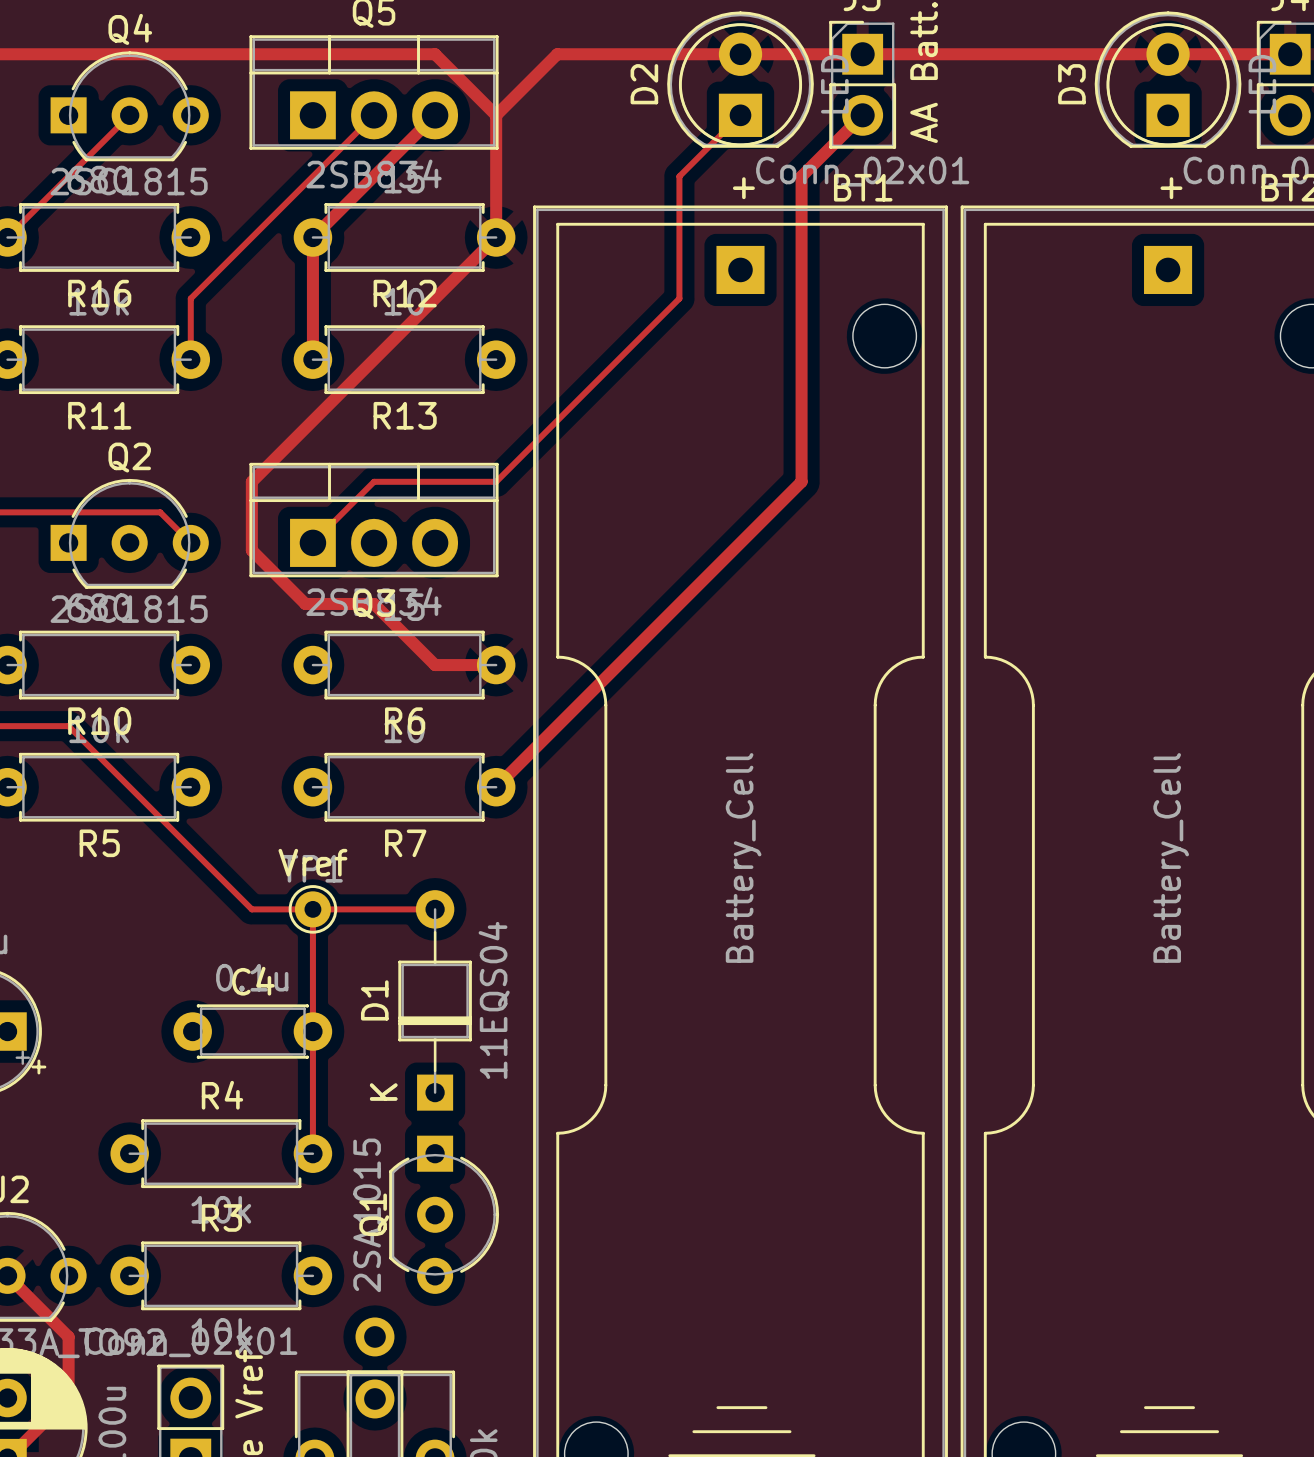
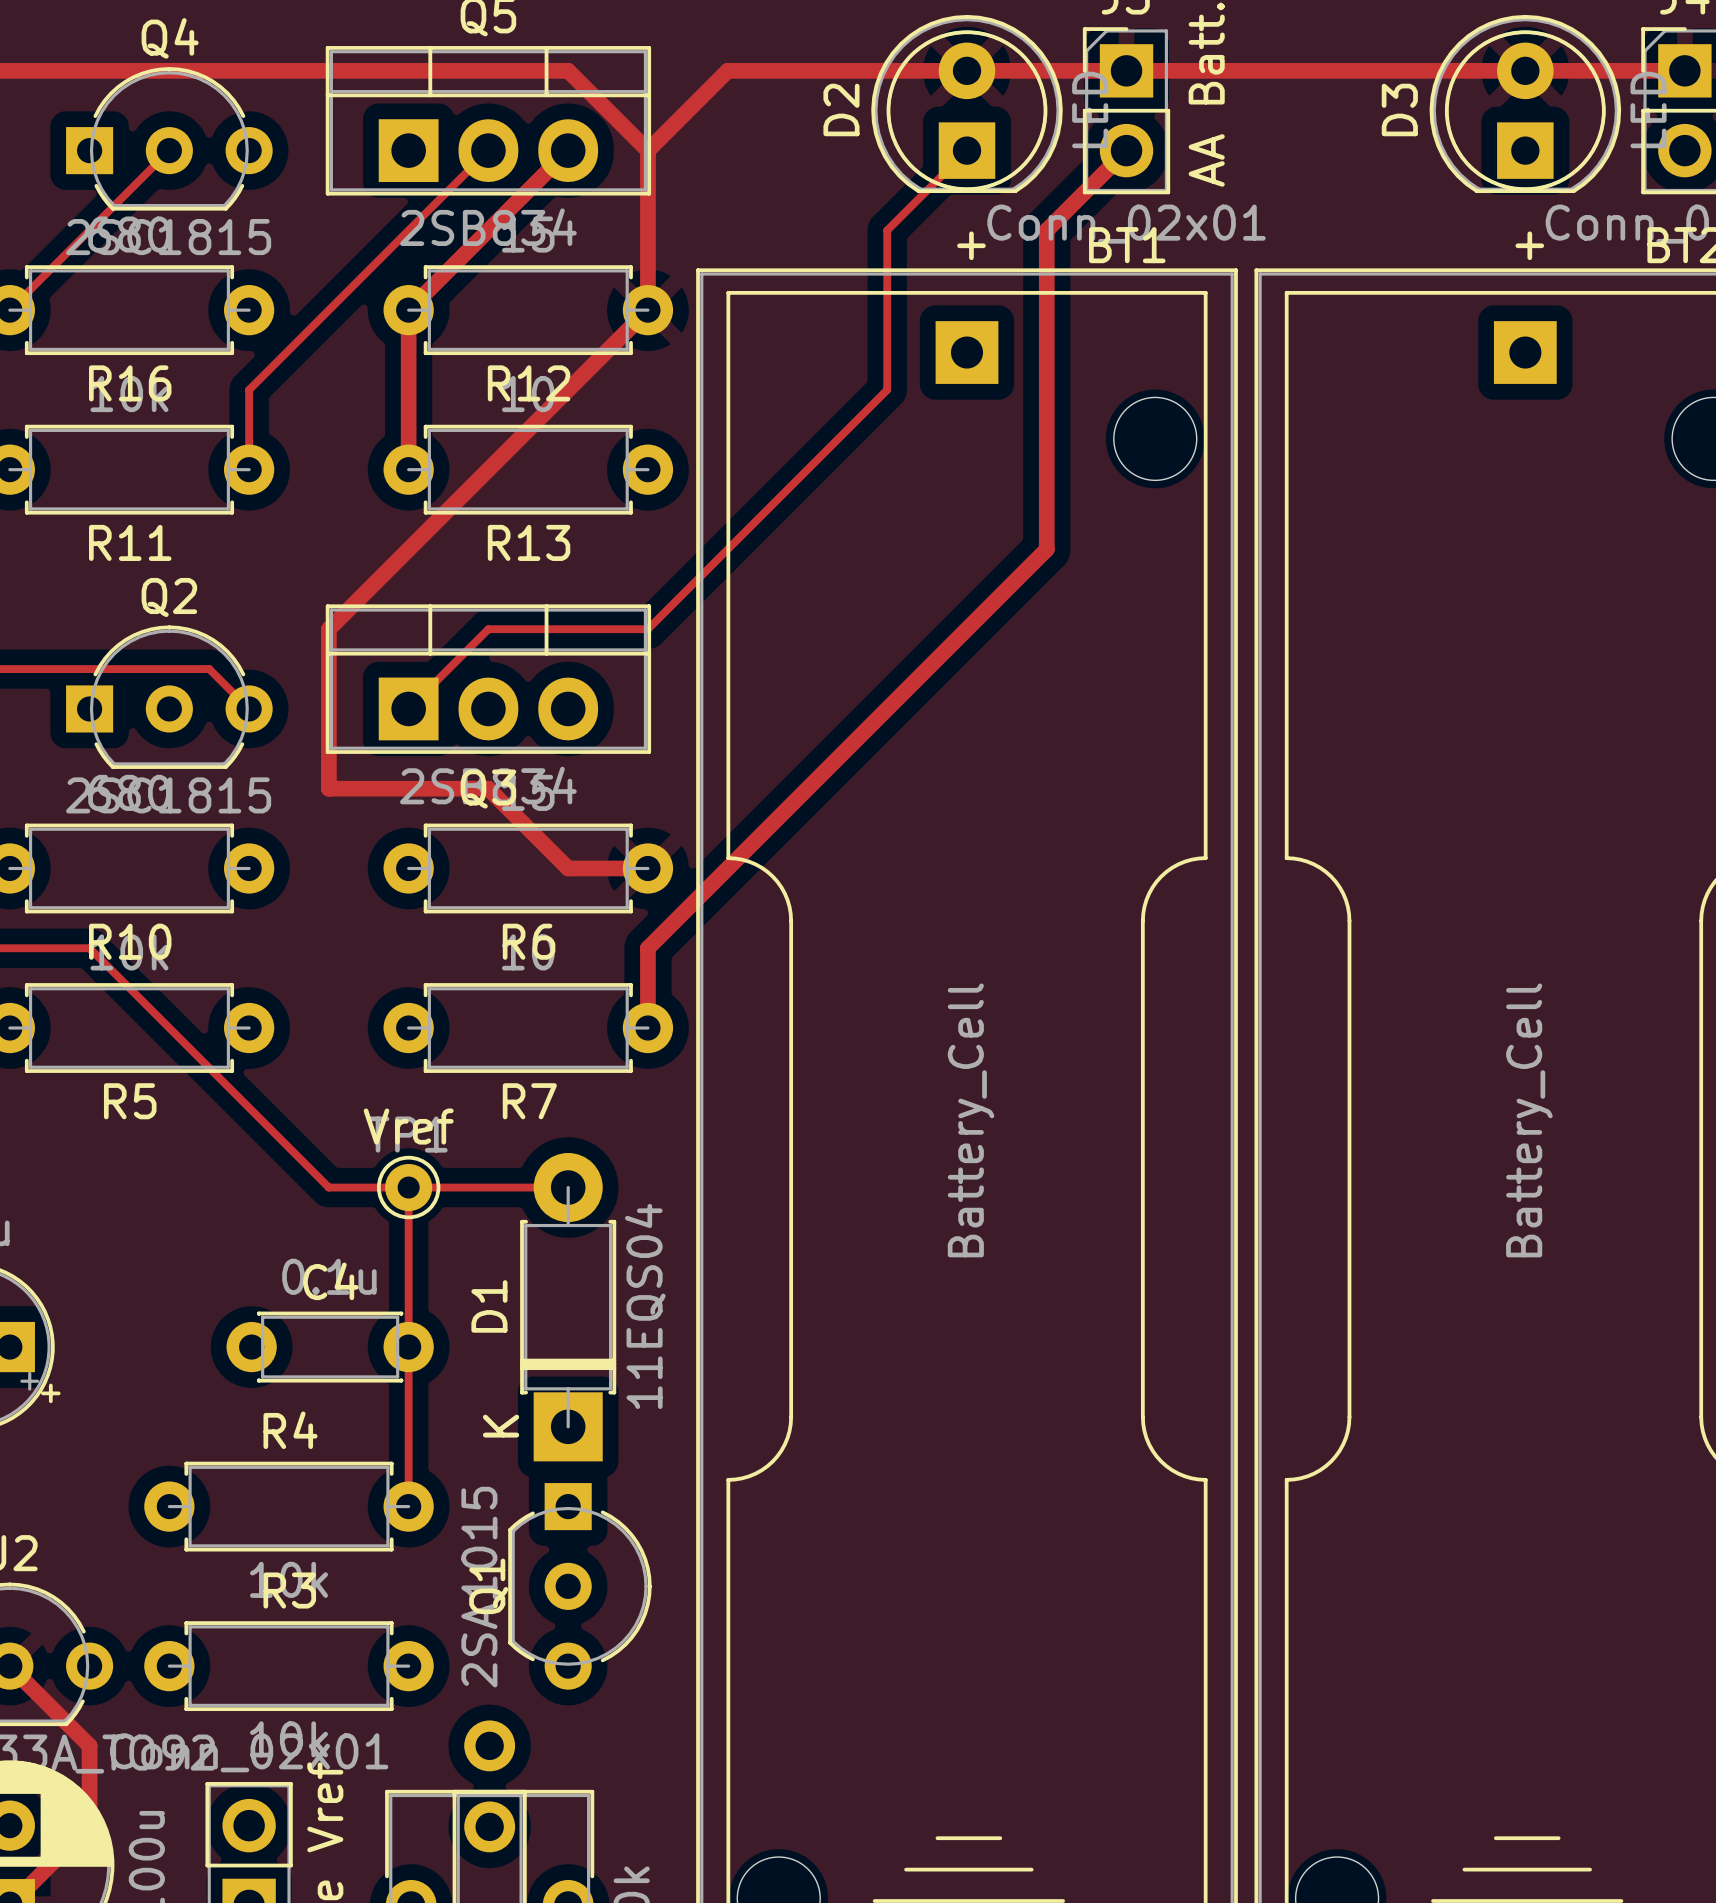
track: (801, 420) (801, 481) (496, 787) -> (1046, 549) (647, 948) (647, 1028)
track: (251, 550) (305, 603) -> (328, 718) (328, 788) (398, 788)
D1 footprint: [398, 890, 472, 1111] -> [520, 1152, 617, 1462]

